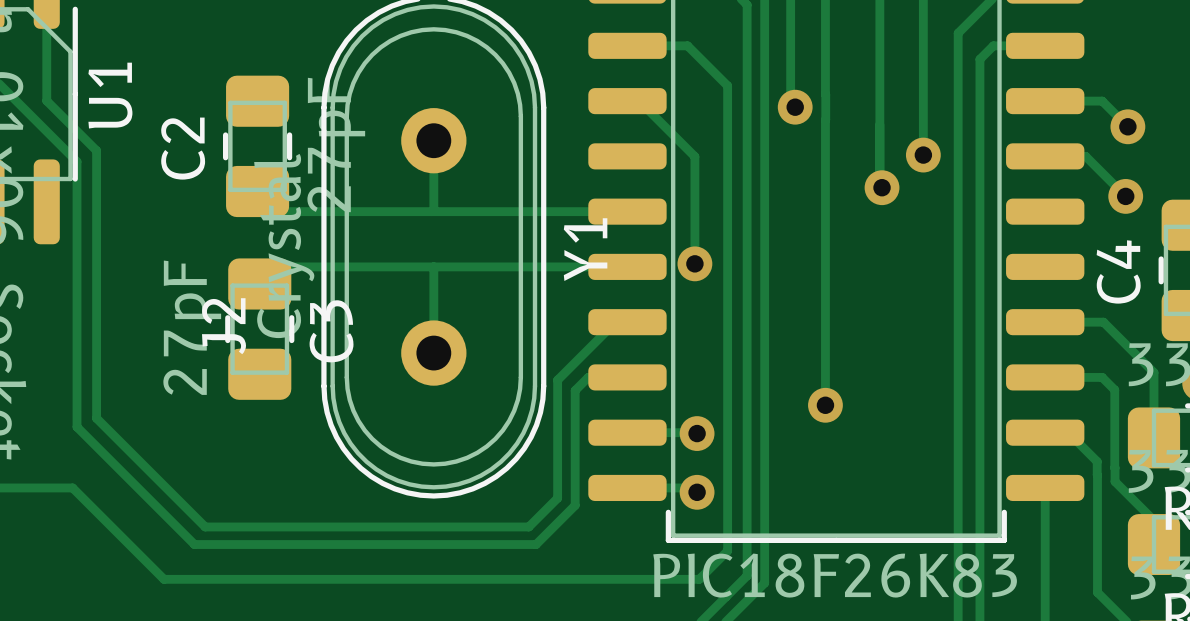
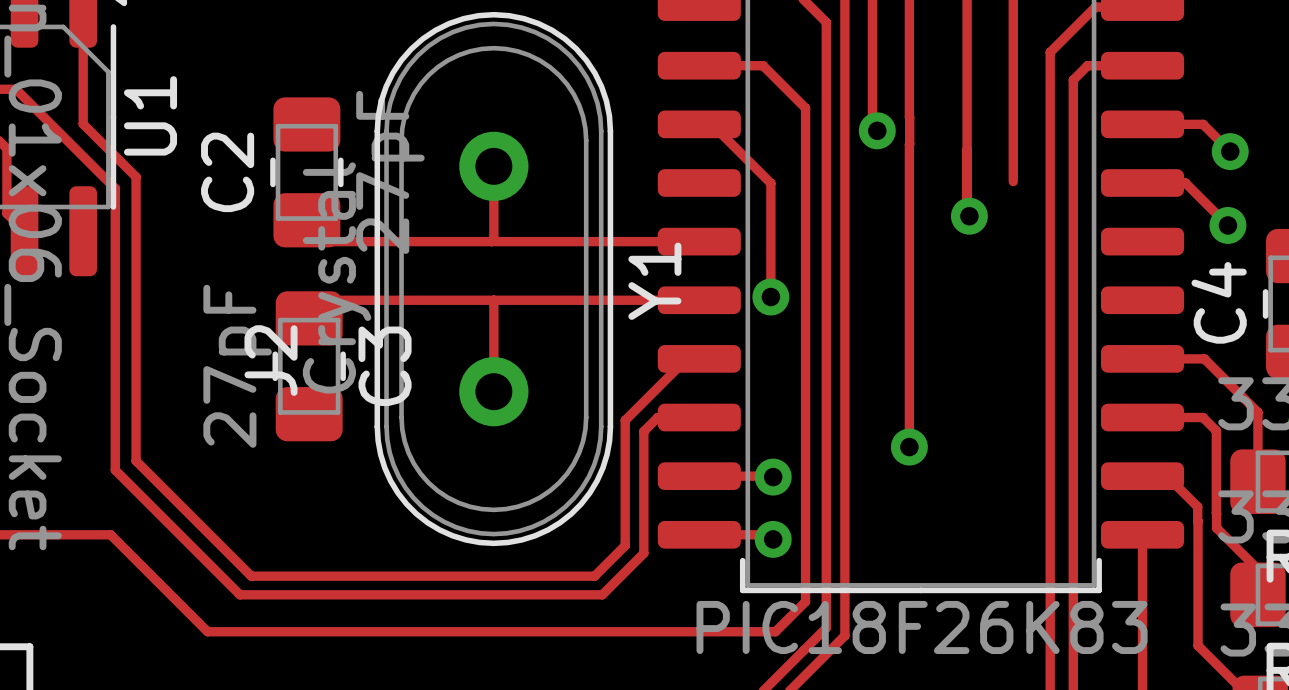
via: (923, 155) -> none

